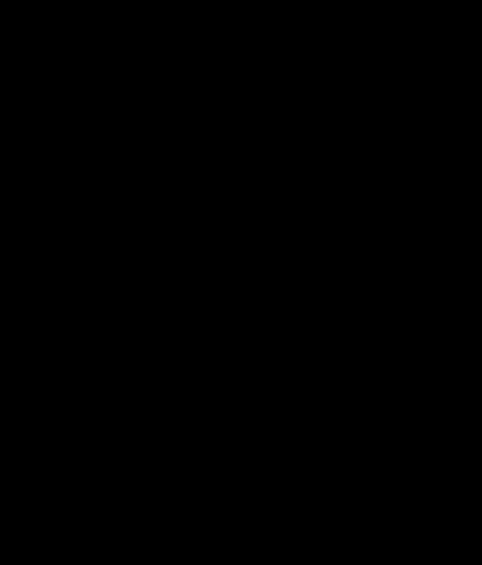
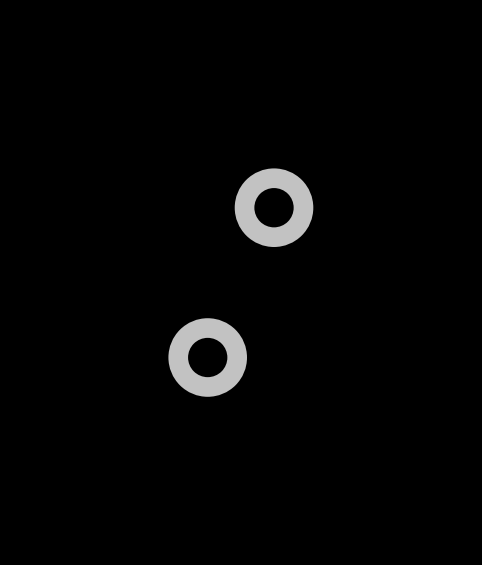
via: none -> (274, 207)
via: none -> (207, 357)

